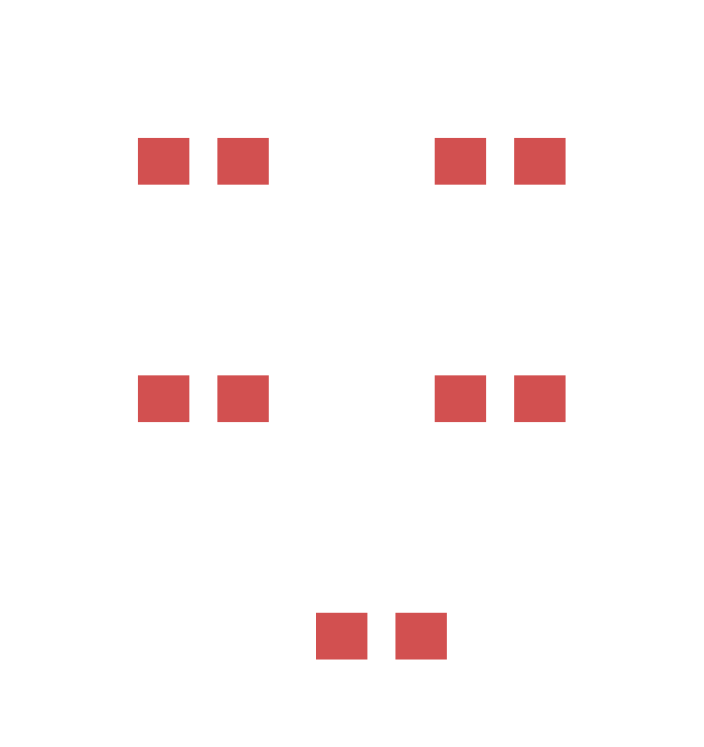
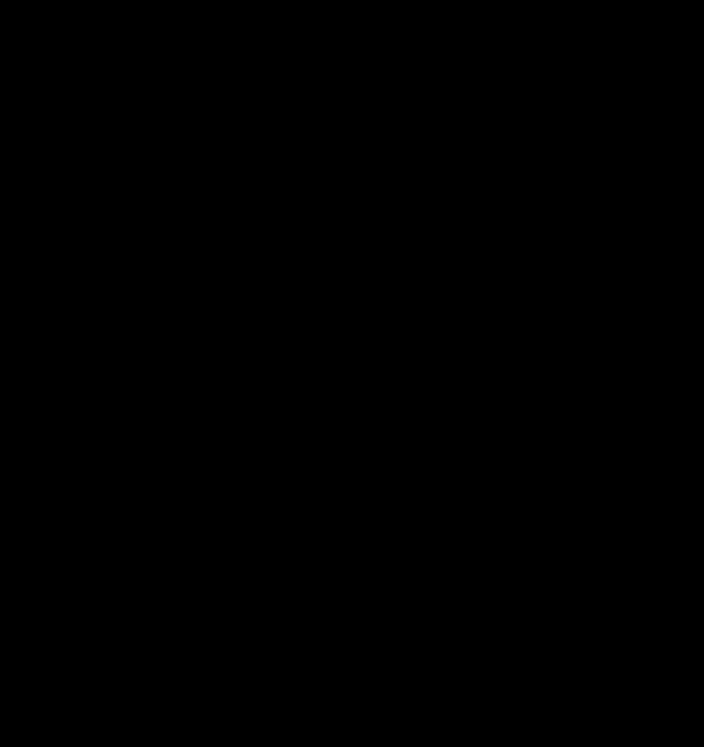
part: (203, 161) -> none
part: (500, 161) -> none
part: (203, 398) -> none
part: (500, 398) -> none
part: (381, 636) -> none

